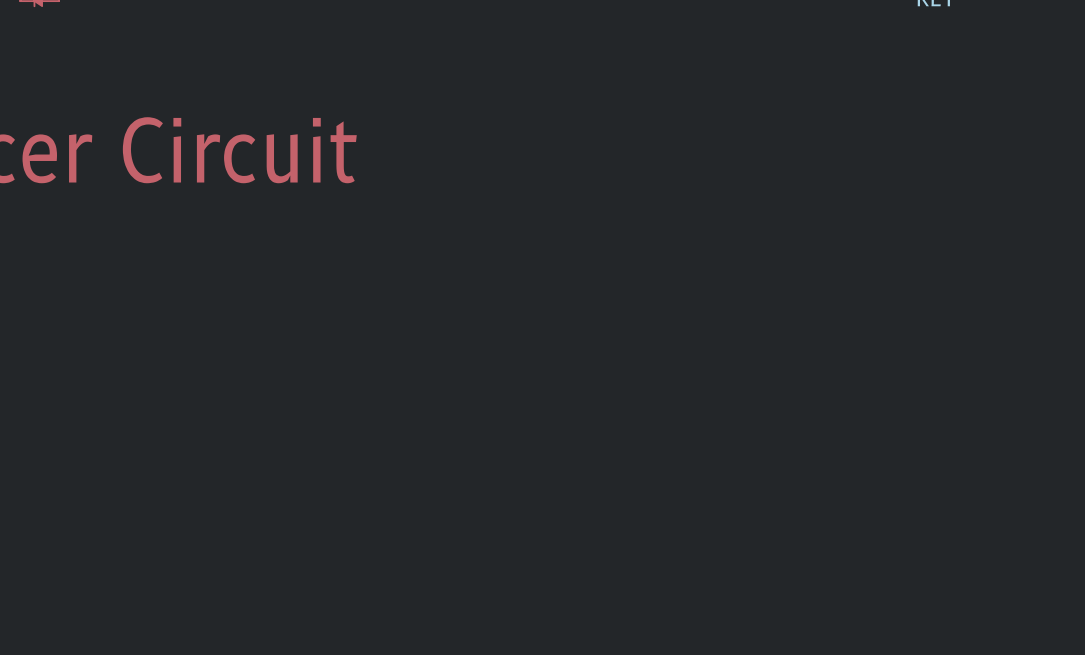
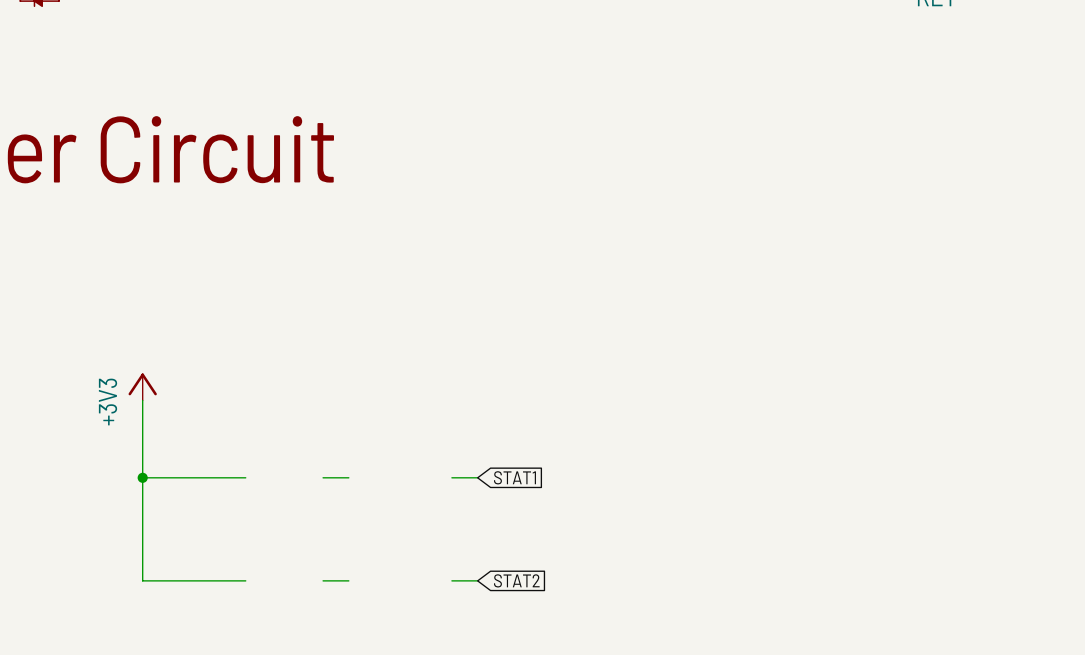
power symbol: none -> +3V3 (142, 386)
wire: none -> (142, 400) (142, 580) (245, 580)
wire: none -> (142, 477) (245, 477)
junction: none -> (142, 477)
wire: none -> (323, 477) (348, 477)
wire: none -> (451, 477) (477, 477)
global label: none -> STAT1 (514, 477)
wire: none -> (323, 580) (348, 580)
wire: none -> (451, 580) (477, 580)
global label: none -> STAT2 (516, 580)

